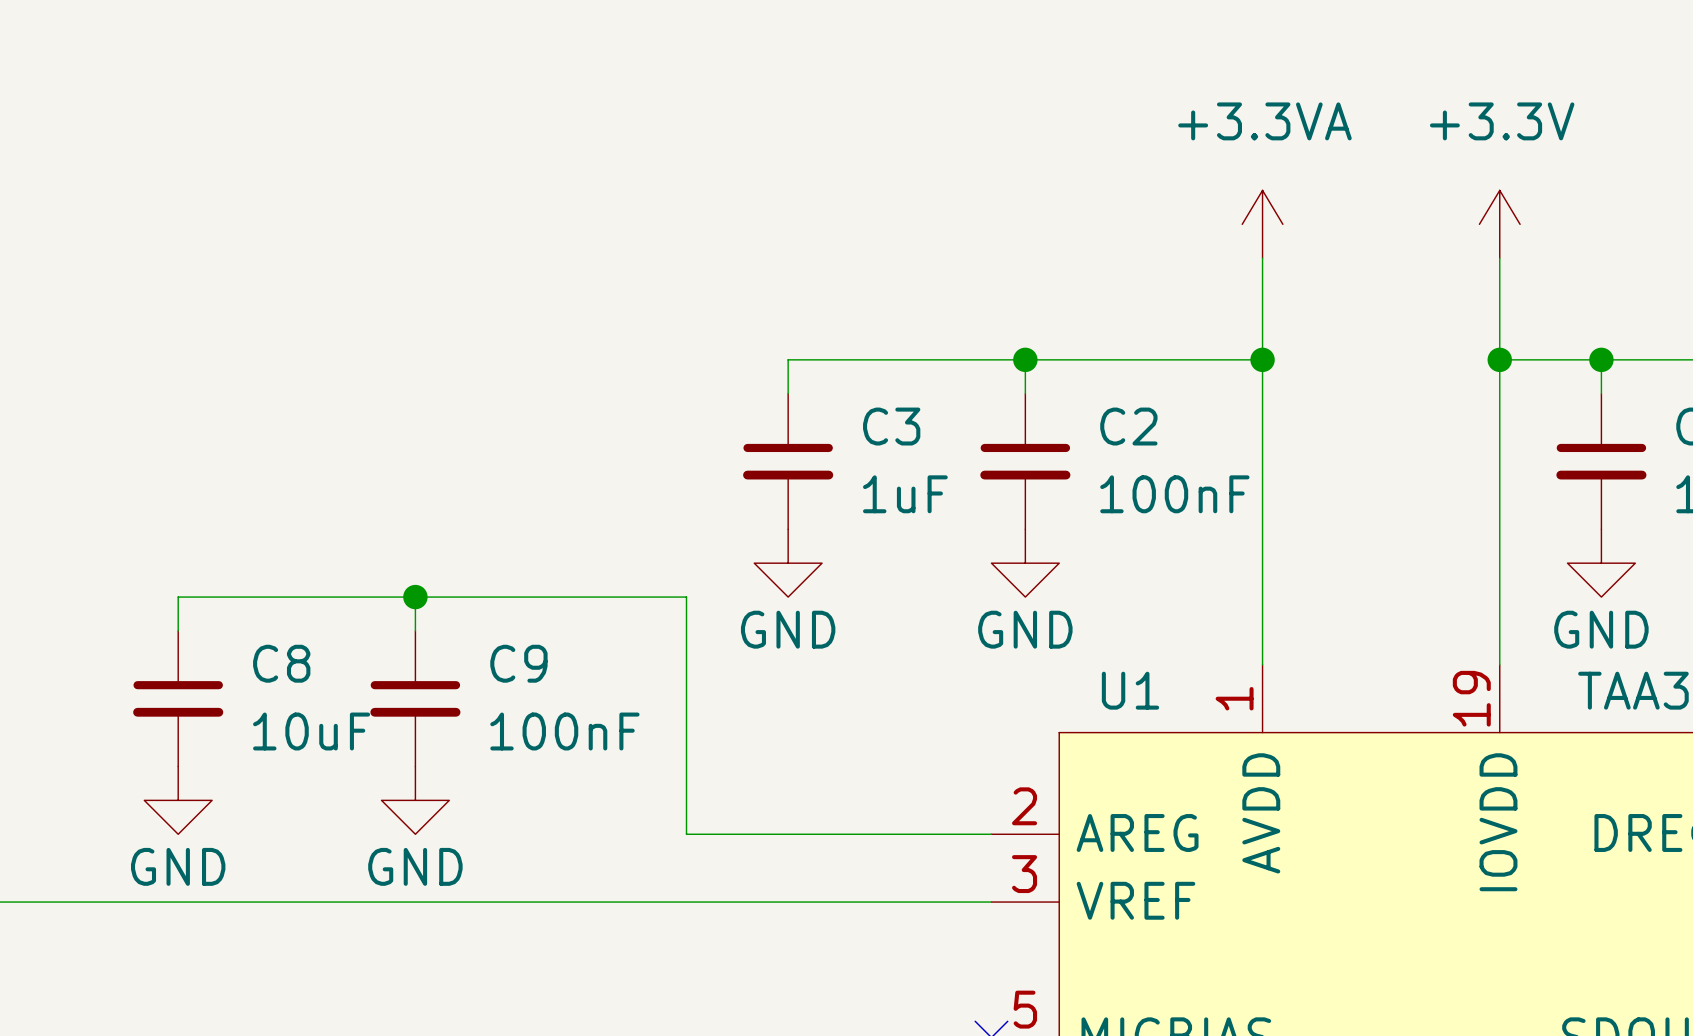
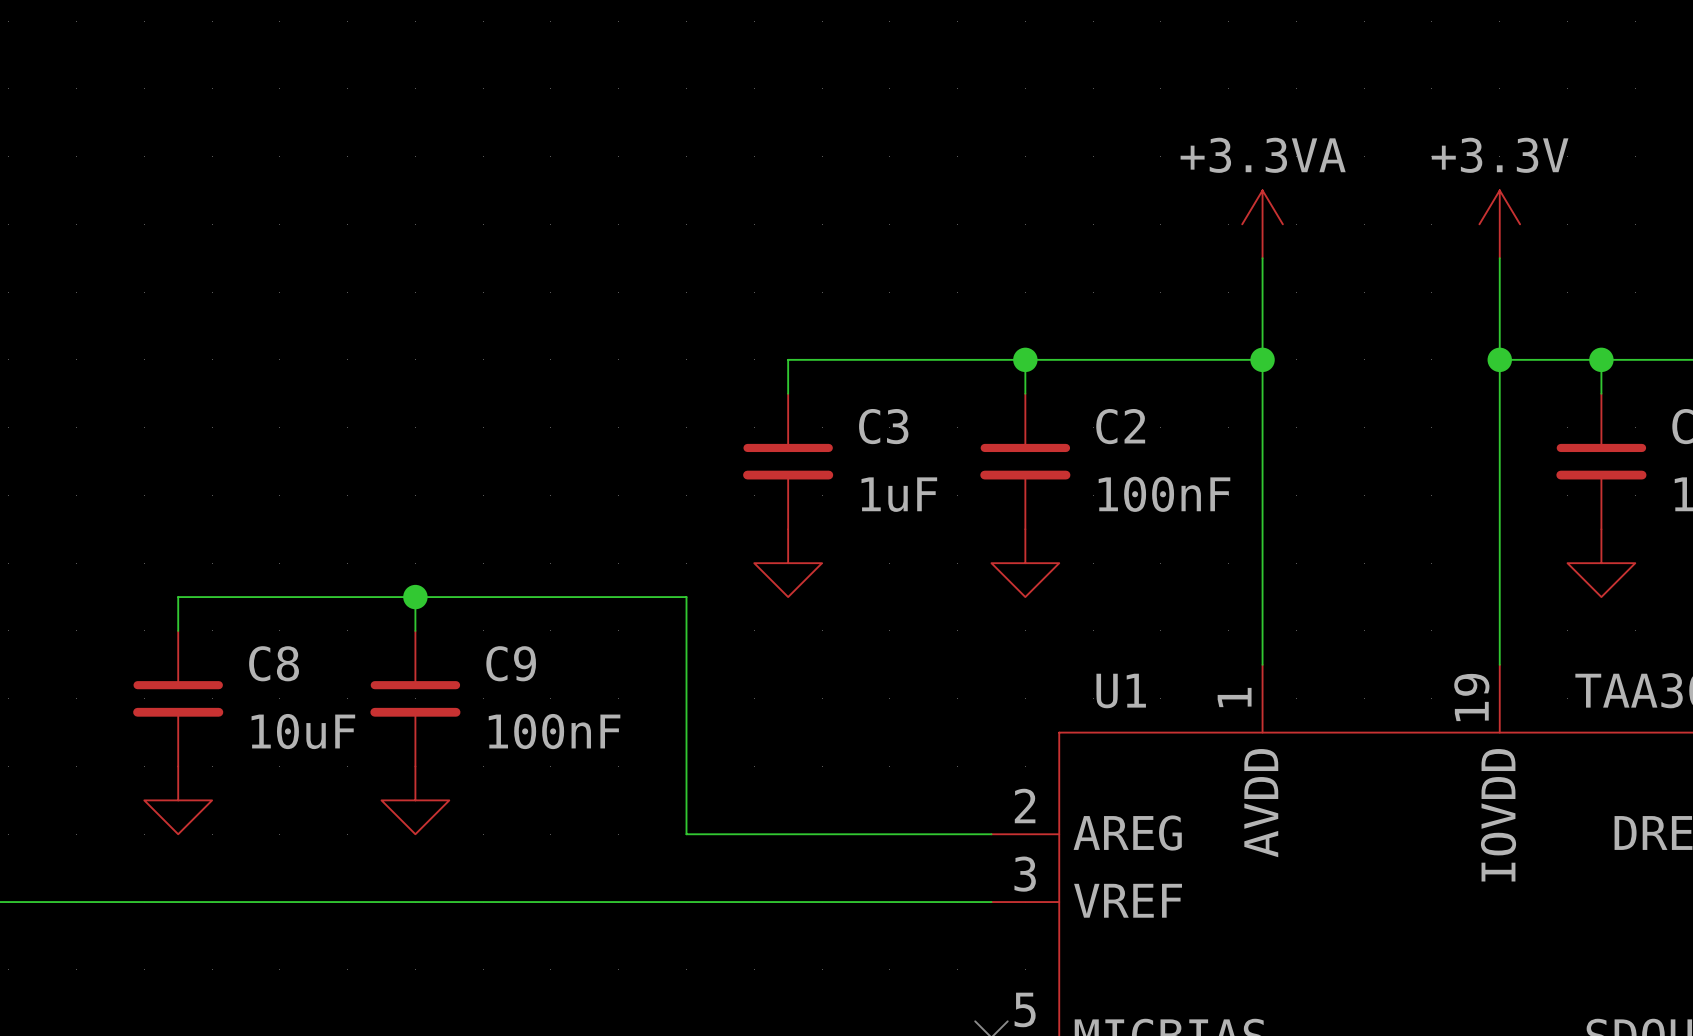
power symbol text position: +3.3VA (1264, 121) -> +3.3VA (1263, 155)
power symbol text position: +3.3V (1502, 121) -> +3.3V (1500, 155)
power symbol text: GND (788, 629) -> none
power symbol text: GND (1025, 629) -> none
power symbol text: GND (1601, 629) -> none
power symbol text: GND (178, 866) -> none
power symbol text: GND (415, 866) -> none

